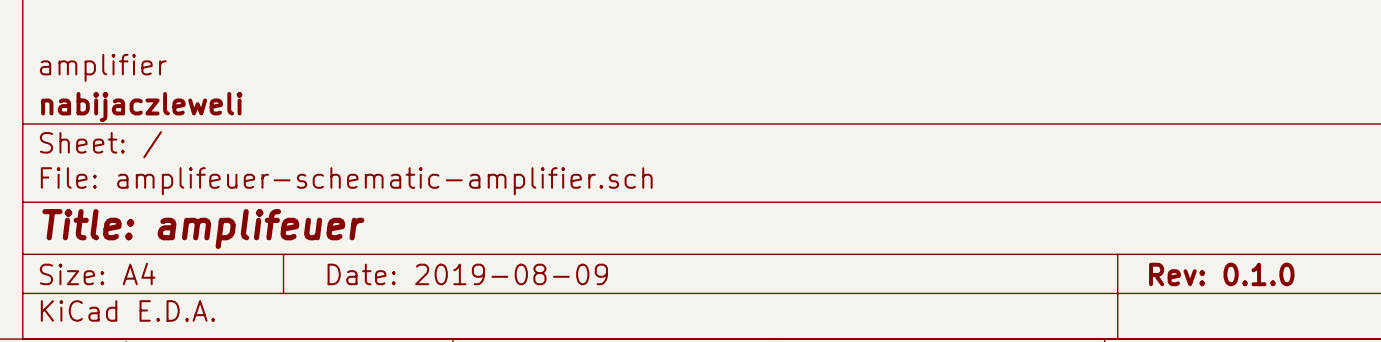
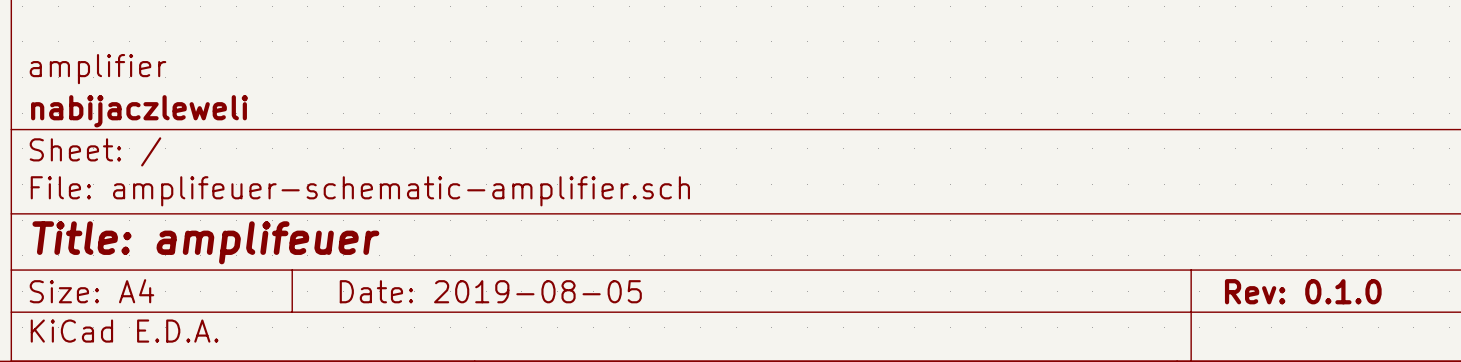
title block: Date: 2019-08-09 (467, 274) -> Date: 2019-08-05 (490, 291)

